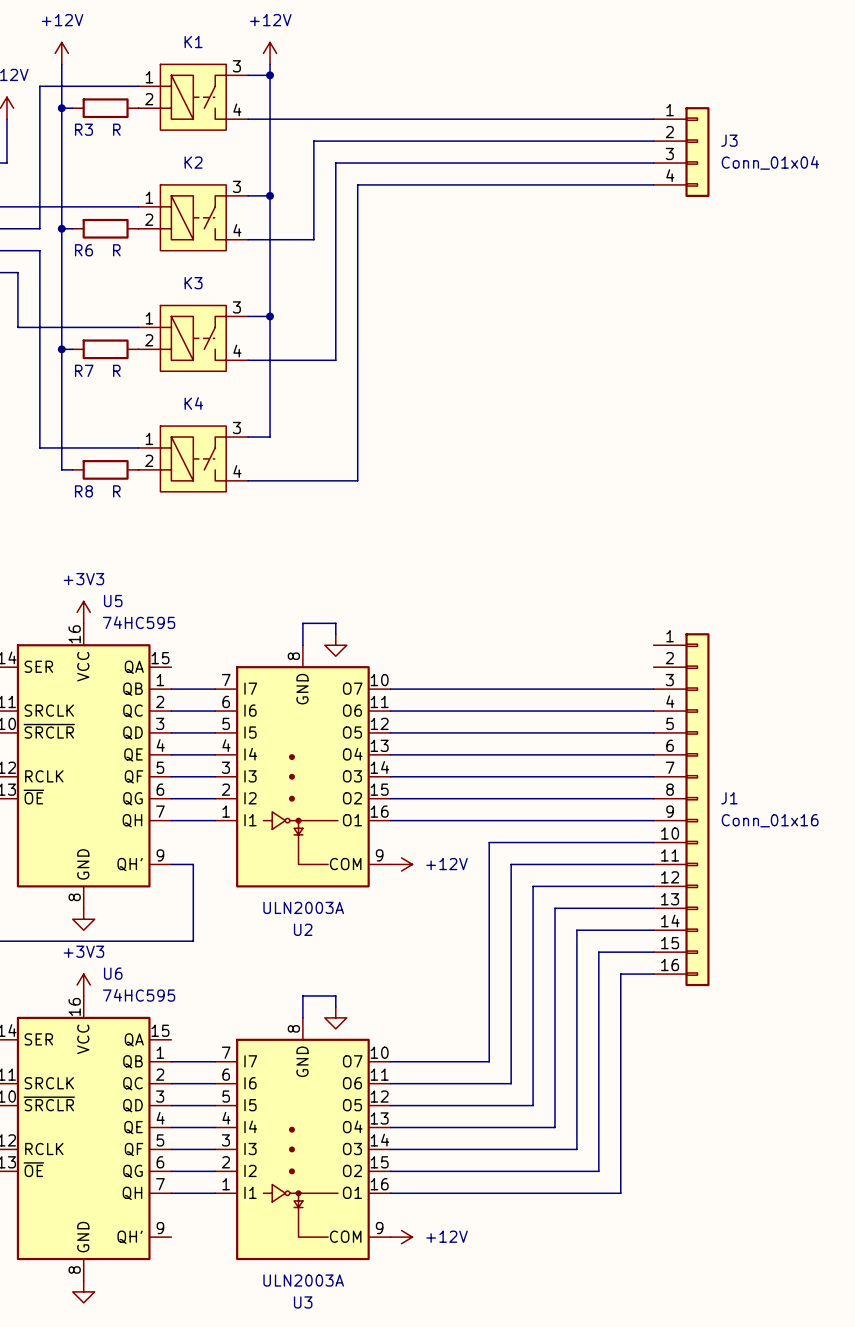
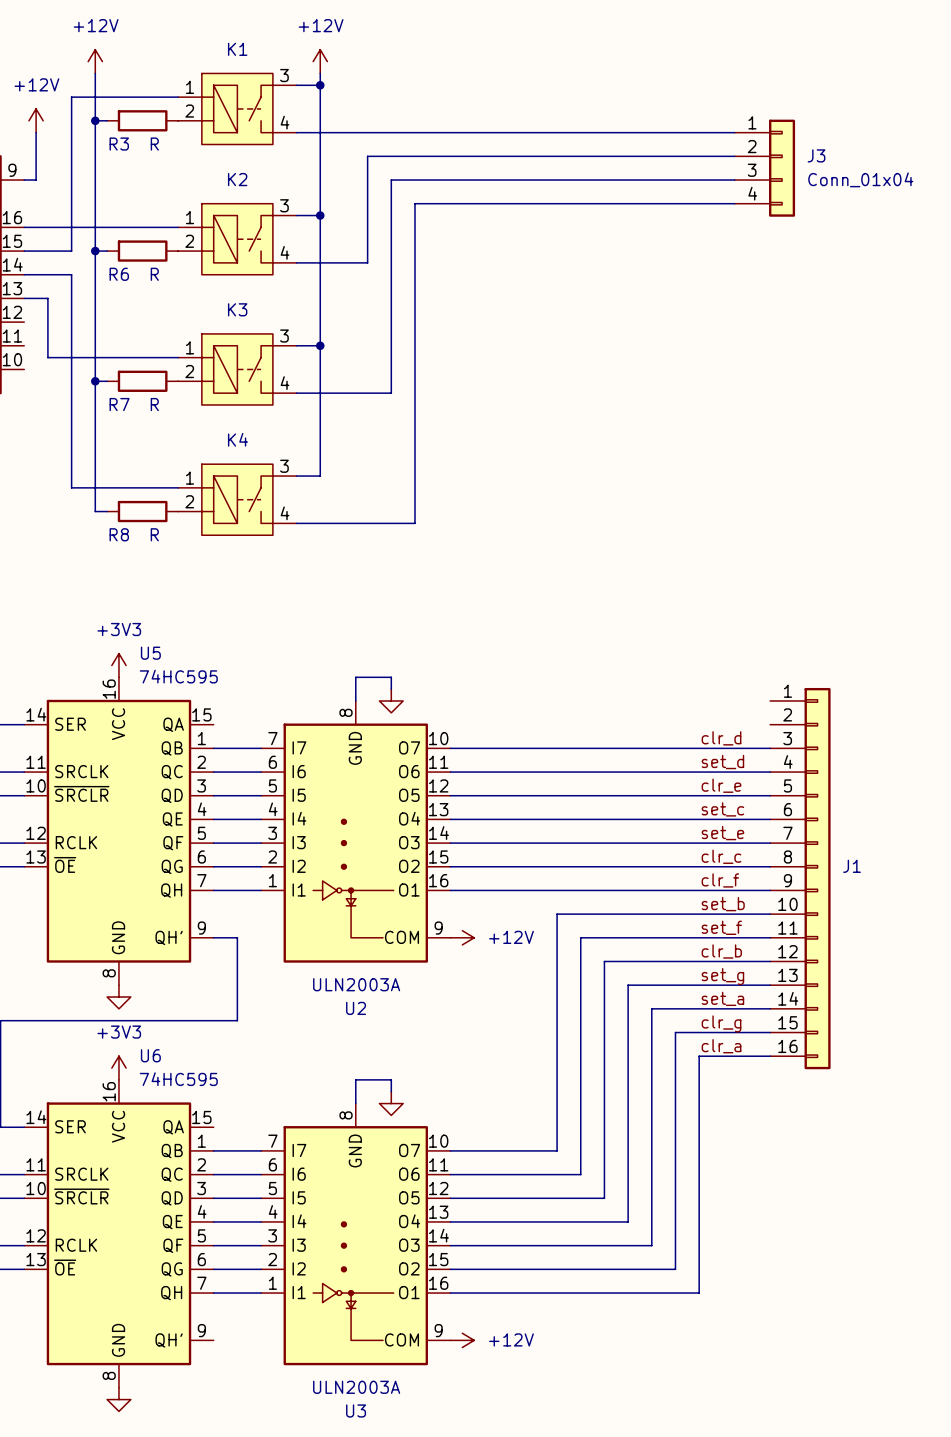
label: none -> clr_d (721, 738)
label: none -> set_d (722, 762)
label: none -> clr_e (721, 785)
label: none -> set_c (722, 809)
label: none -> set_e (722, 833)
label: none -> clr_c (721, 856)
J1 position: (681, 809) -> (800, 878)
label: none -> clr_f (720, 880)
J1 value: Conn_01x16 (770, 820) -> none
label: none -> set_b (723, 904)
label: none -> set_f (721, 927)
label: none -> clr_b (721, 951)
label: none -> set_g (722, 976)
label: none -> set_a (722, 998)
label: none -> clr_g (721, 1023)
label: none -> clr_a (721, 1046)

